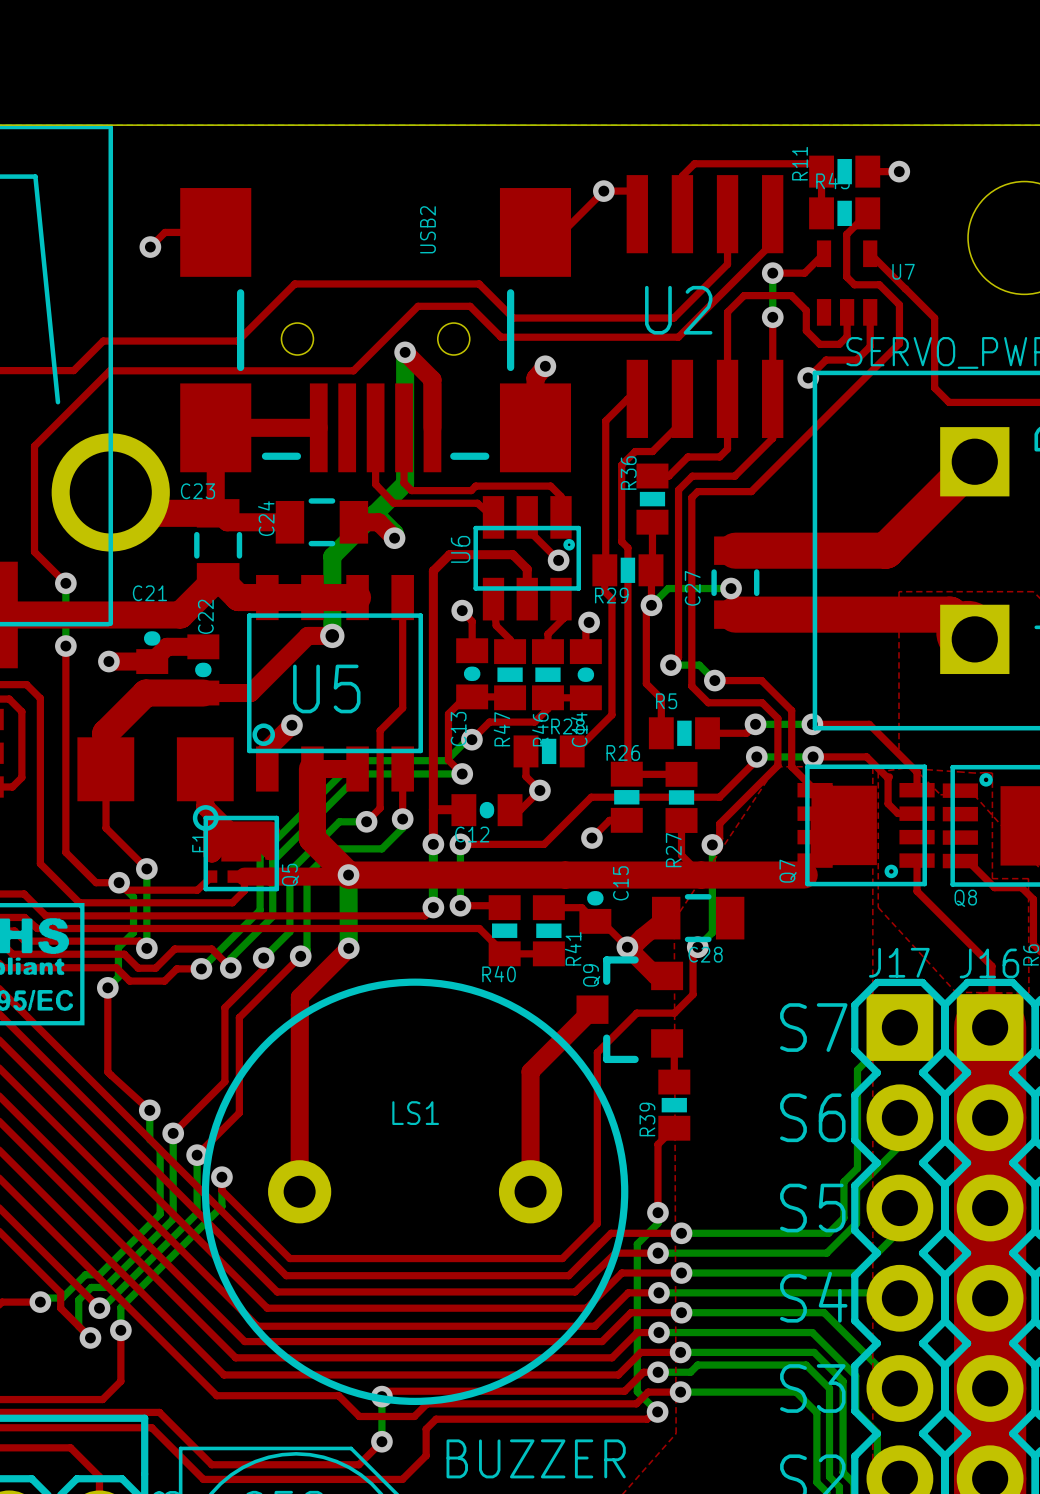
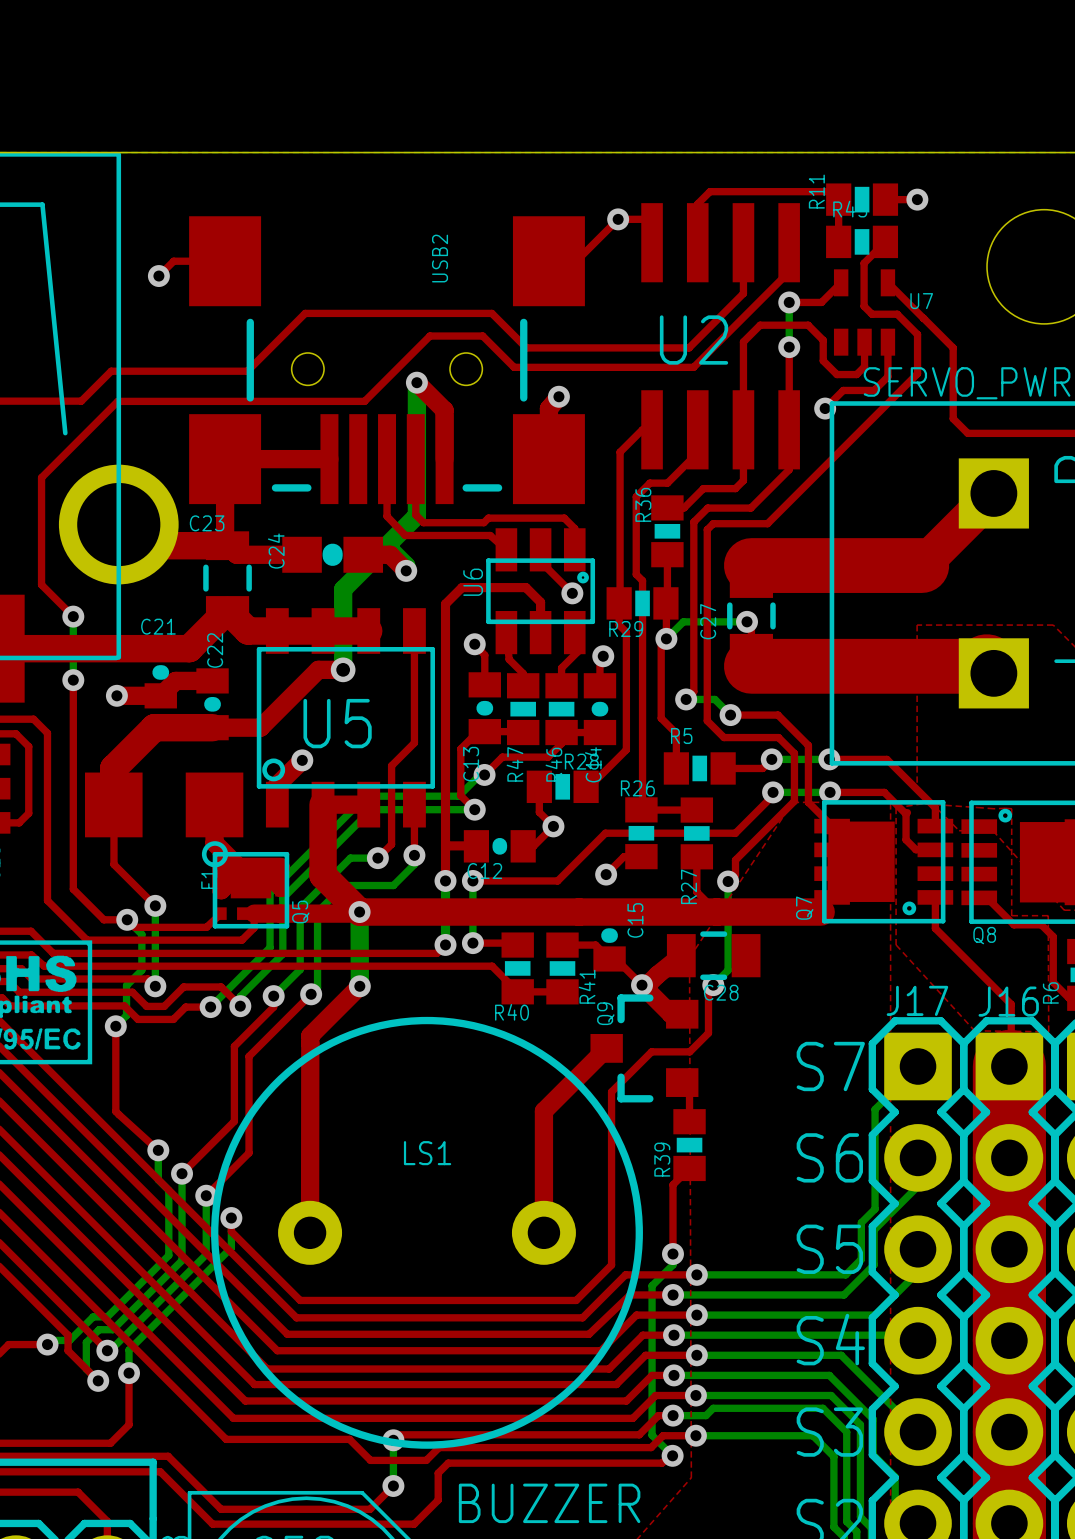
C24 footprint: [275, 498, 369, 547] -> [282, 536, 384, 573]
top track: (903, 532) (885, 550) (735, 550) -> (921, 565) (751, 565)
top track: (735, 614) (950, 614) (974, 639) -> (751, 648) (751, 666) (986, 666)

